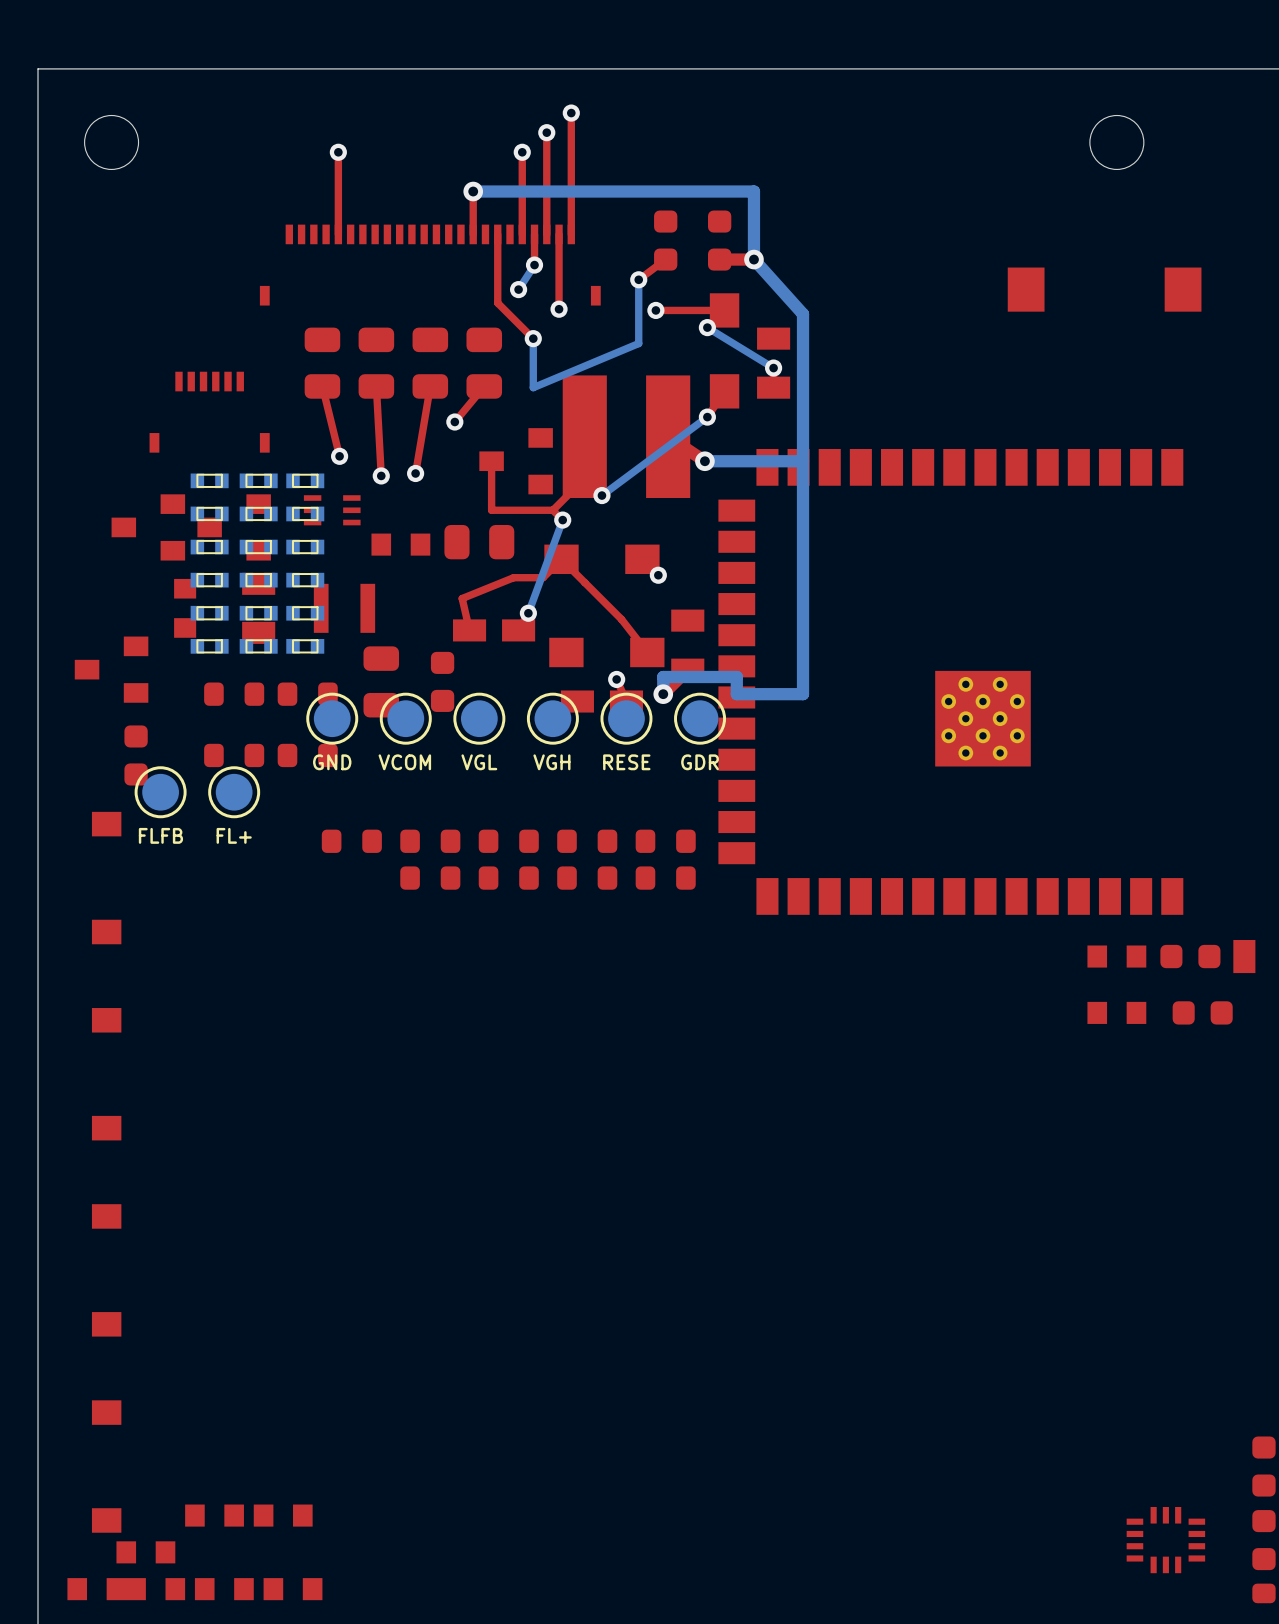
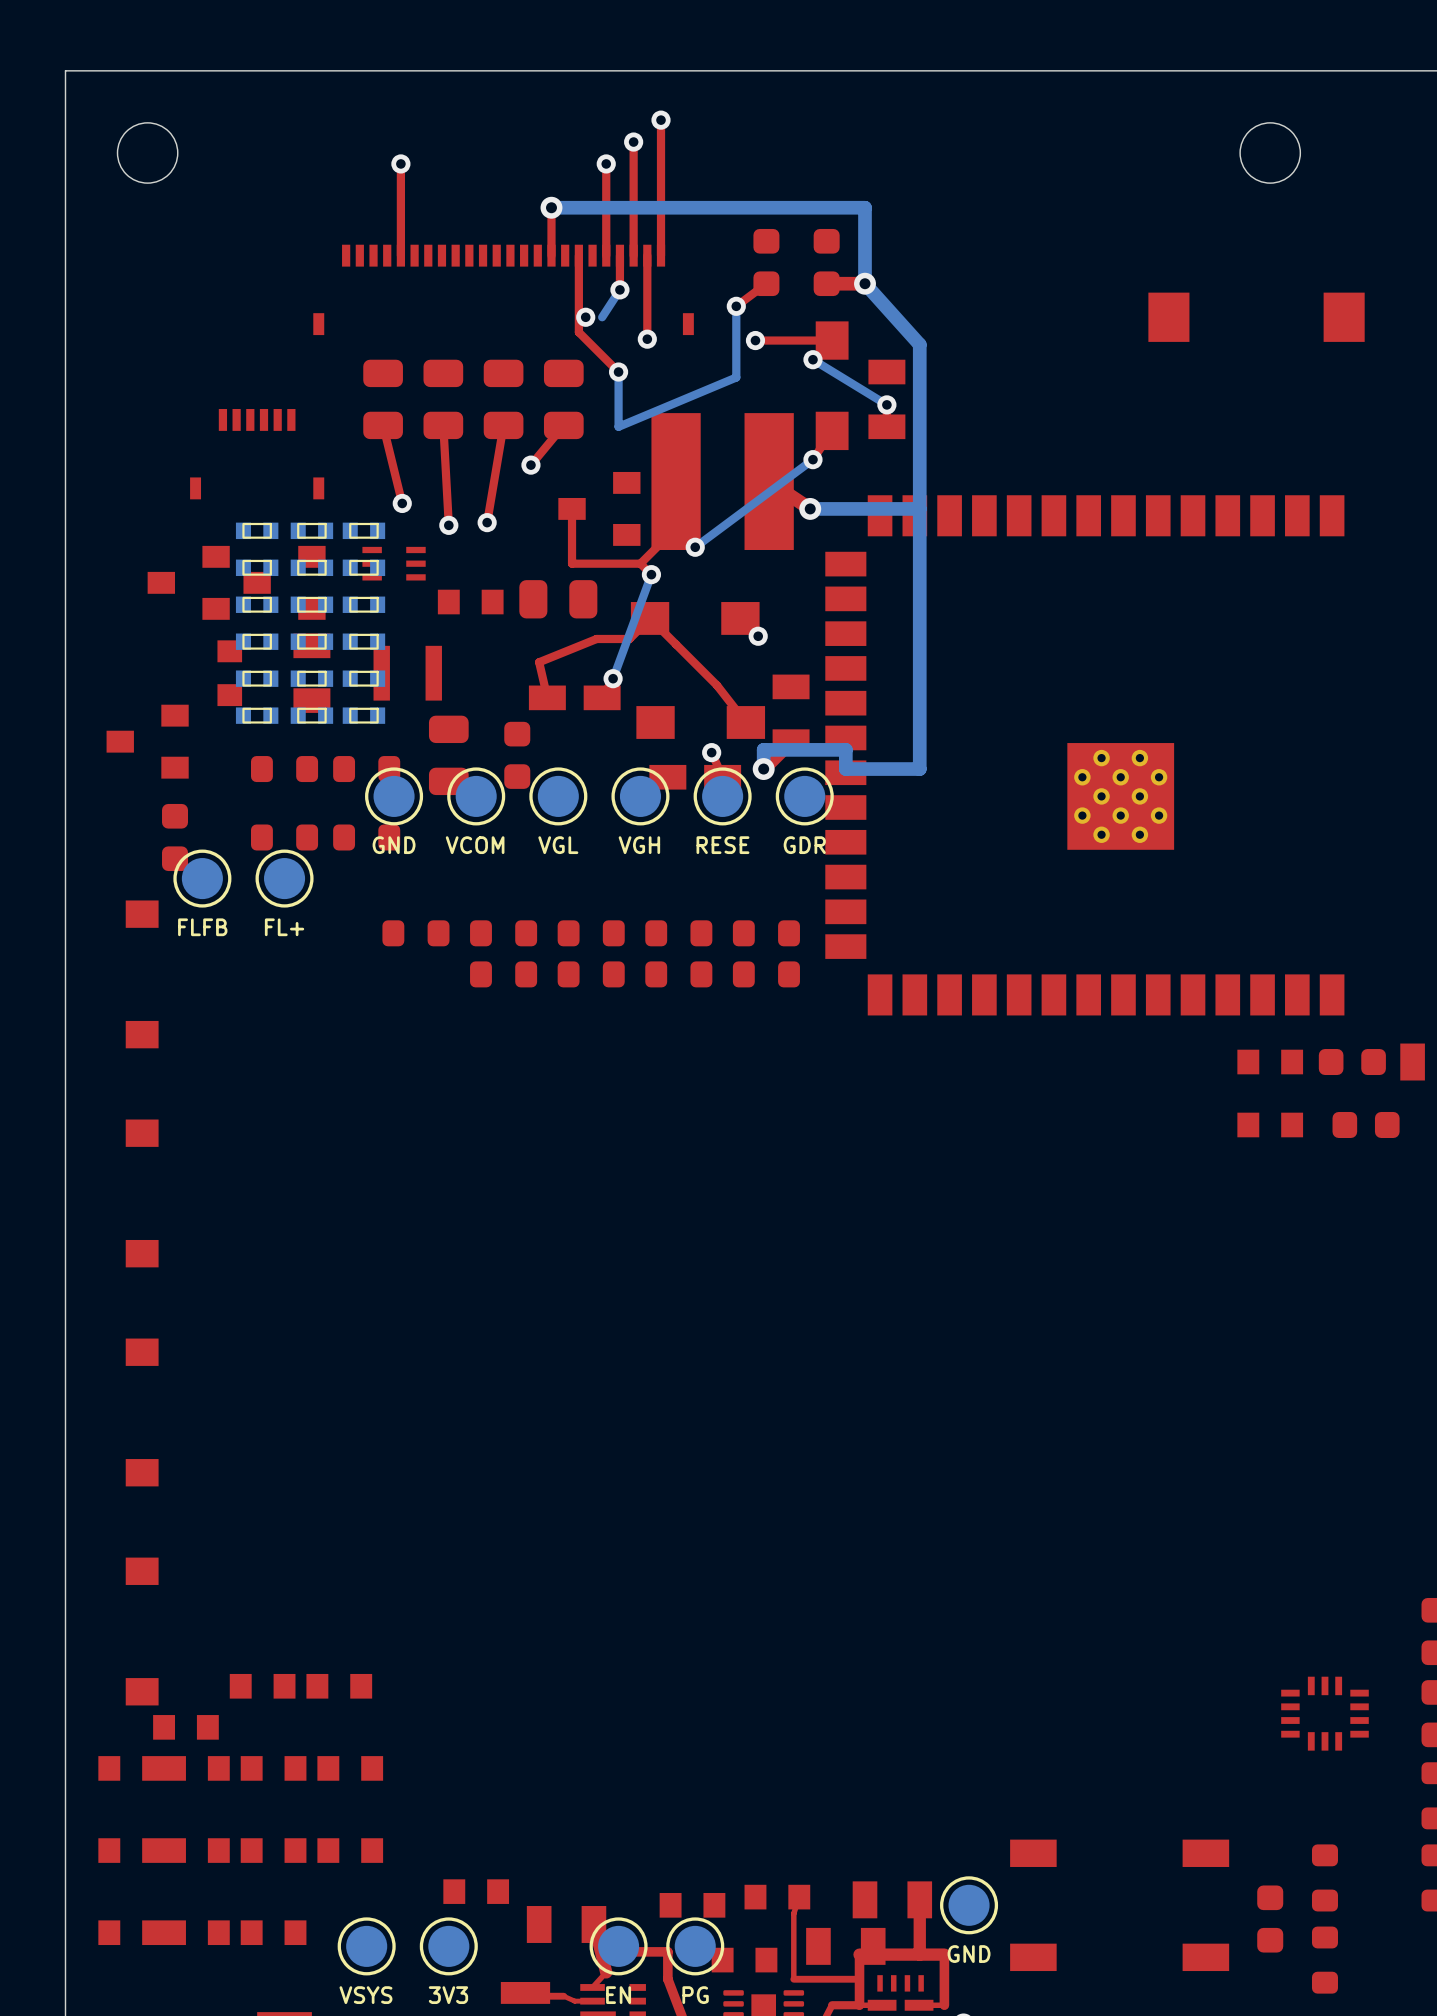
via position: (518, 289) -> (585, 317)

